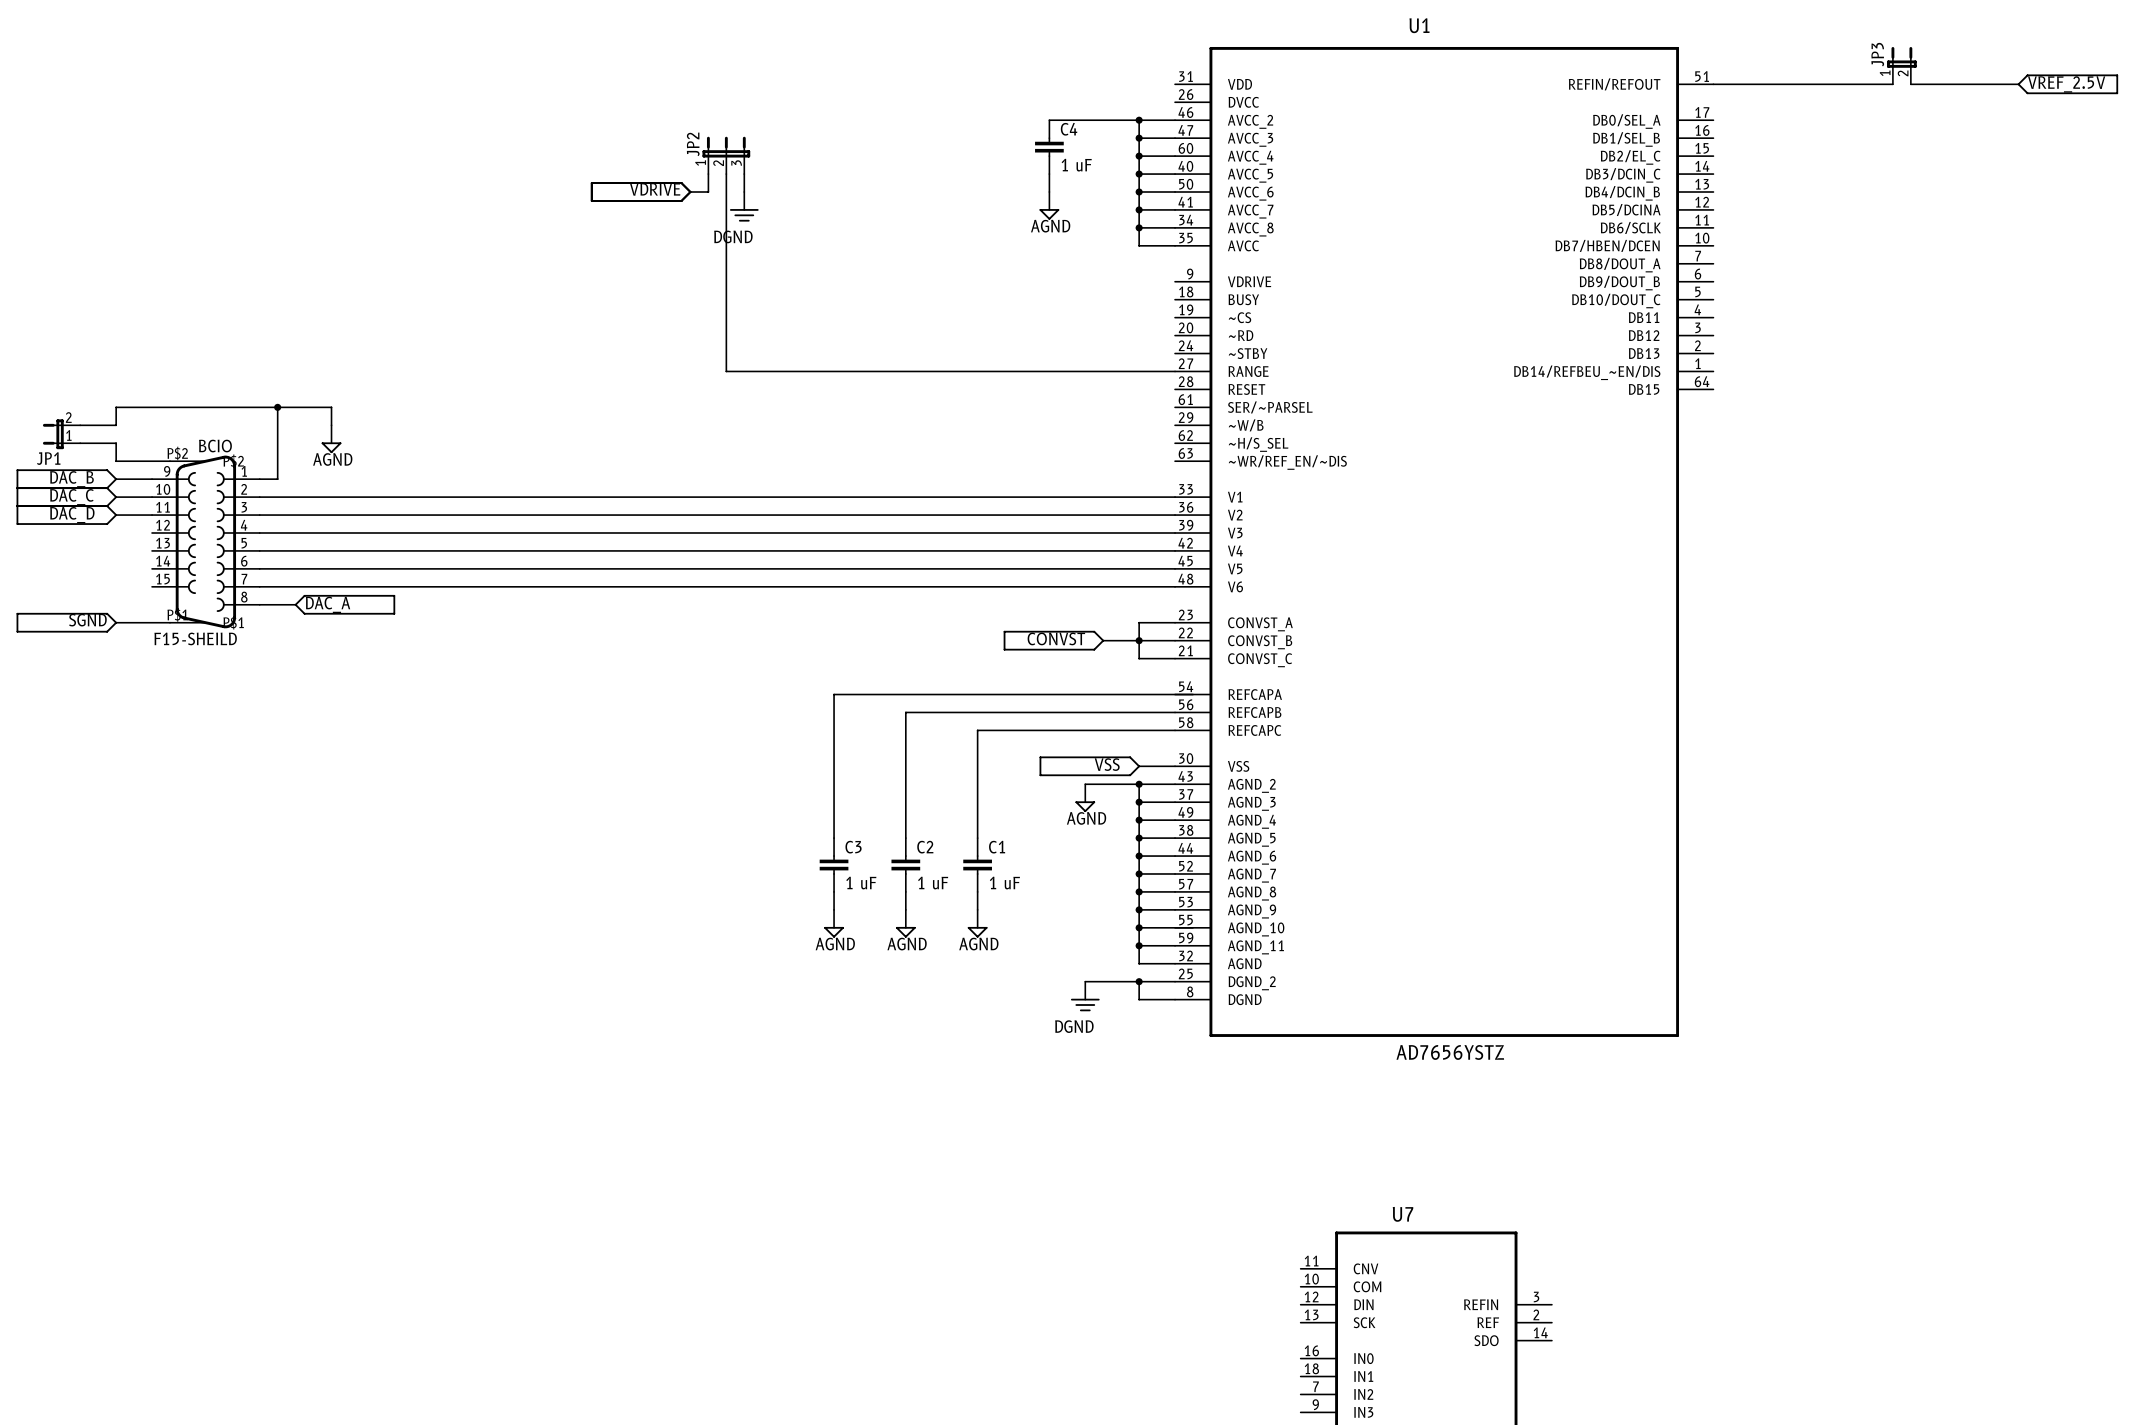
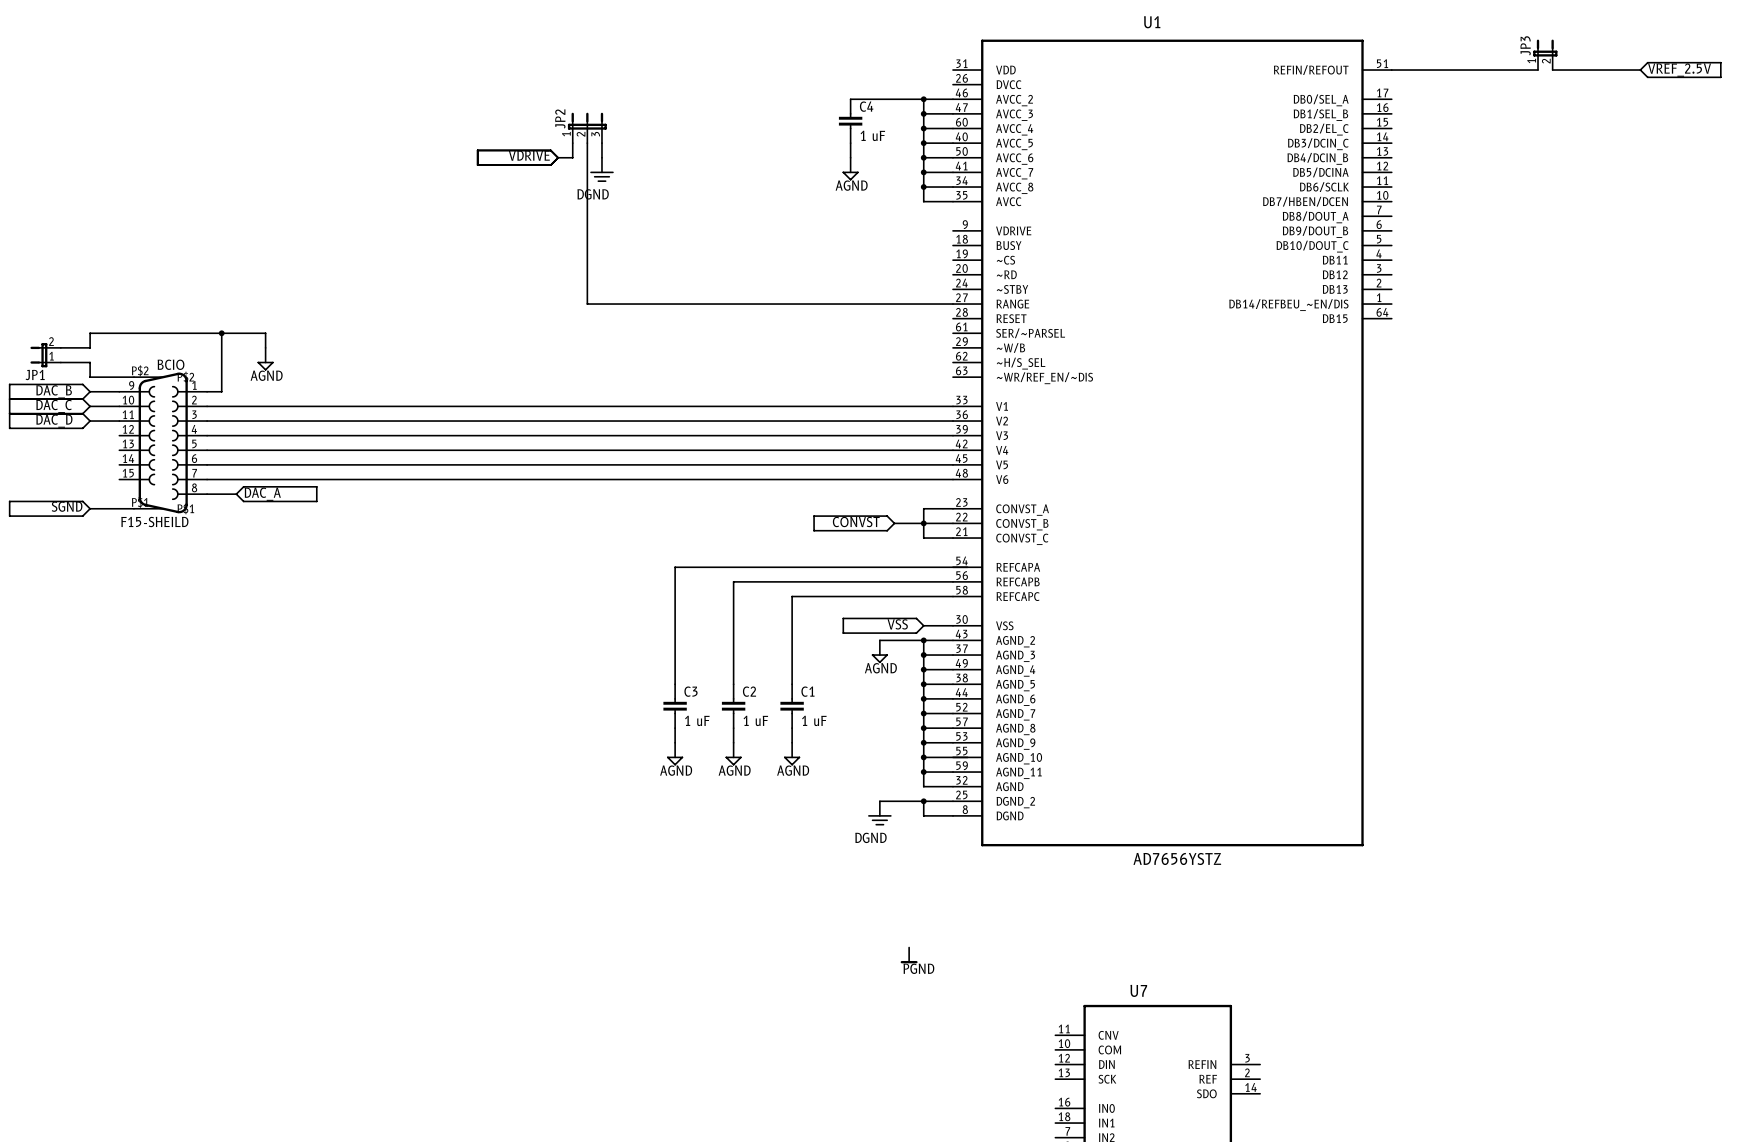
power symbol: none -> PGND (909, 955)

